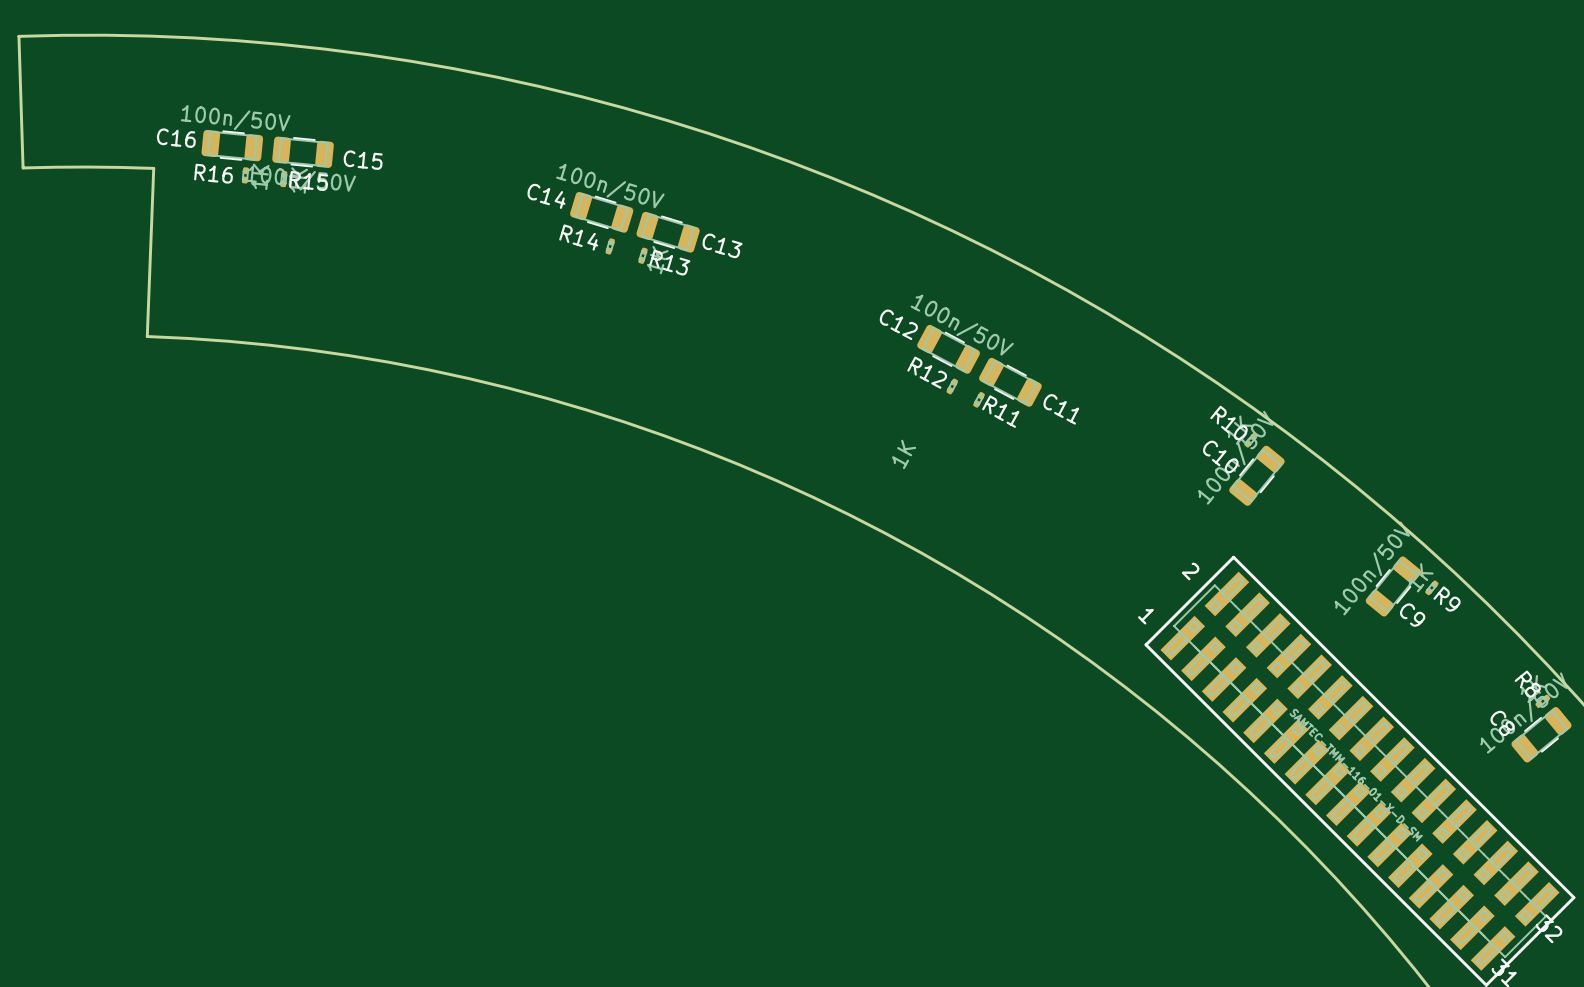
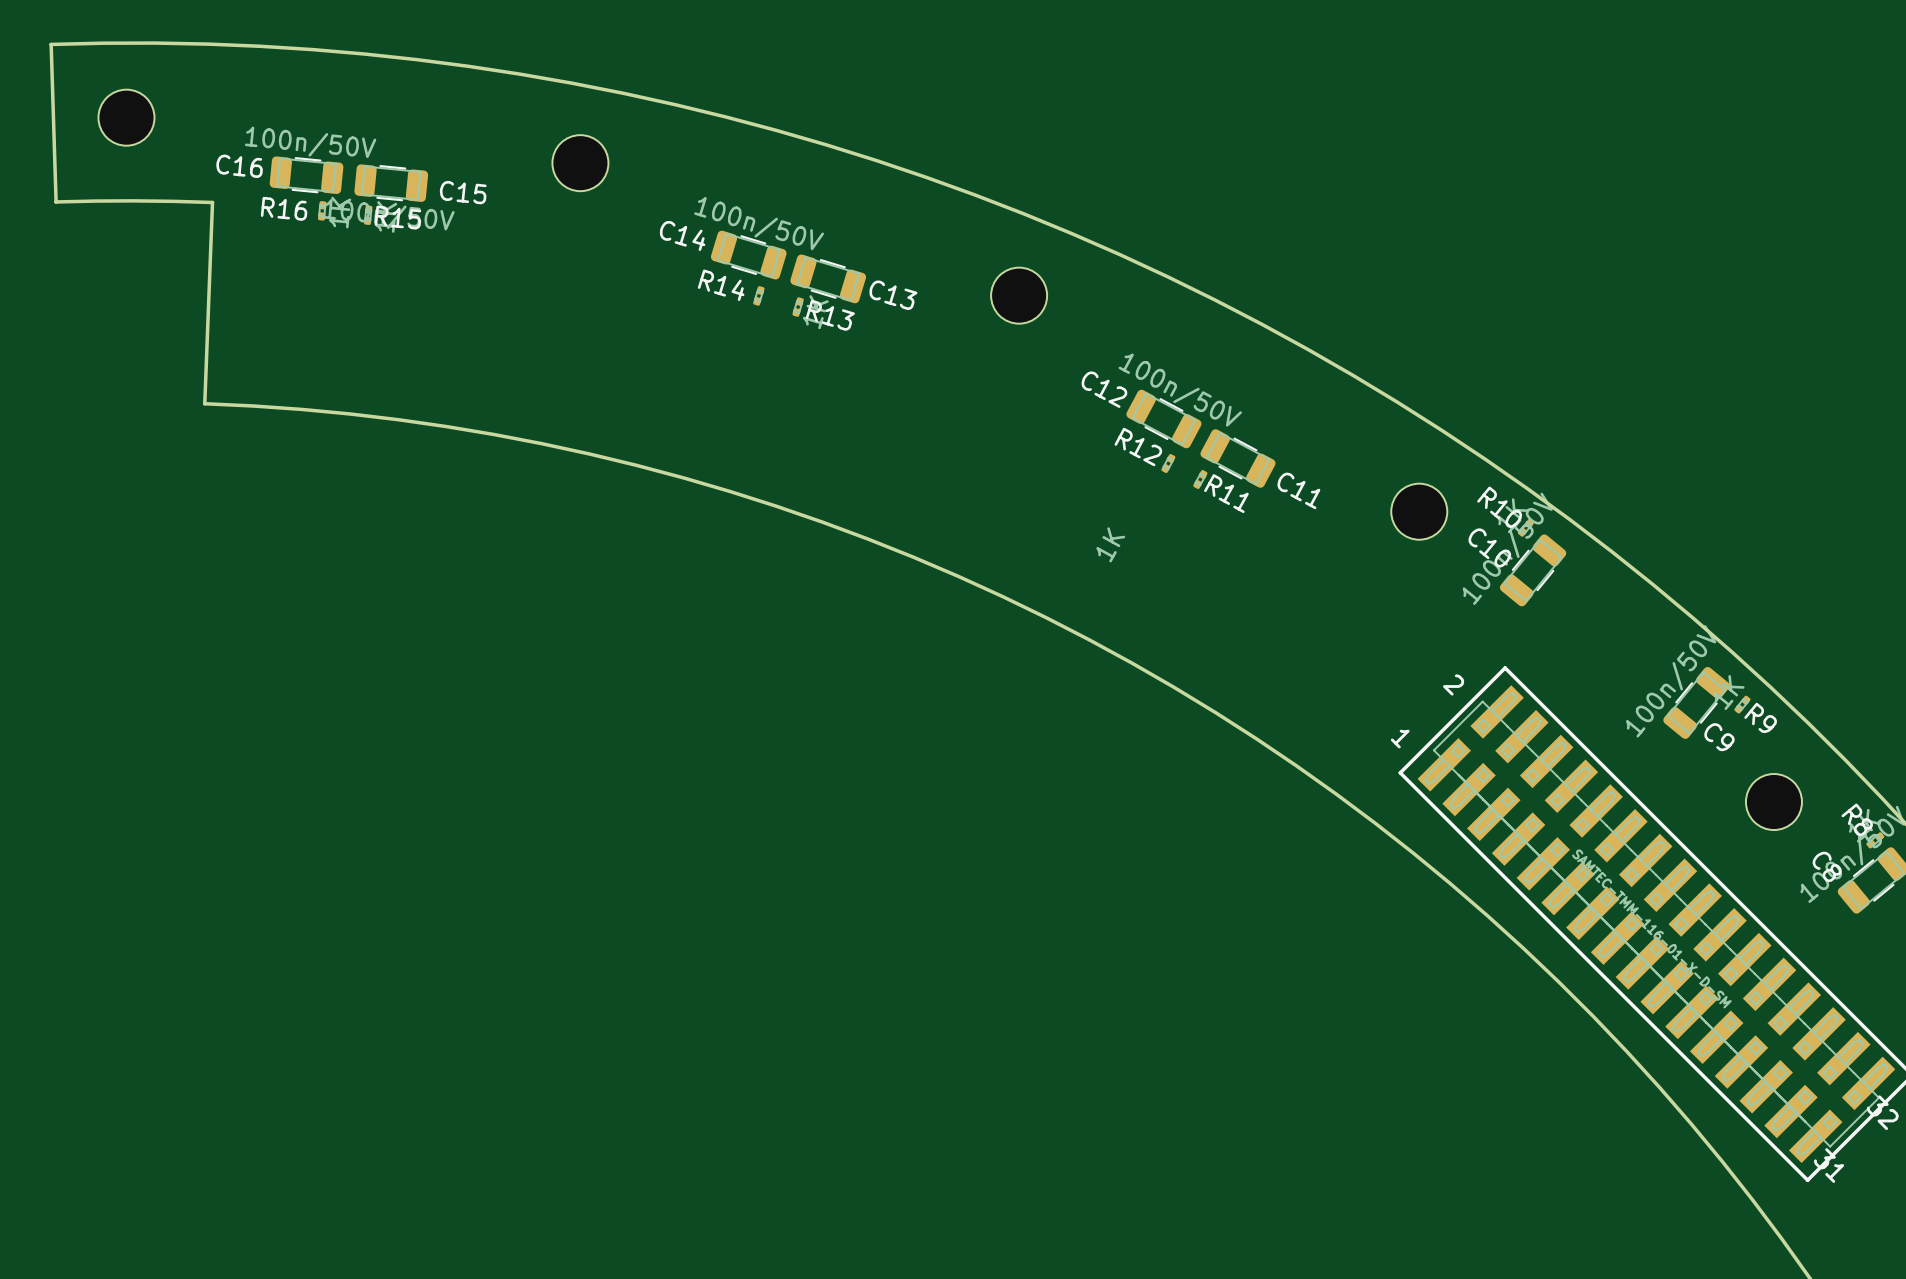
part: none -> (126, 117)
part: none -> (580, 163)
part: none -> (1019, 295)
part: none -> (1419, 511)
part: none -> (1773, 802)

